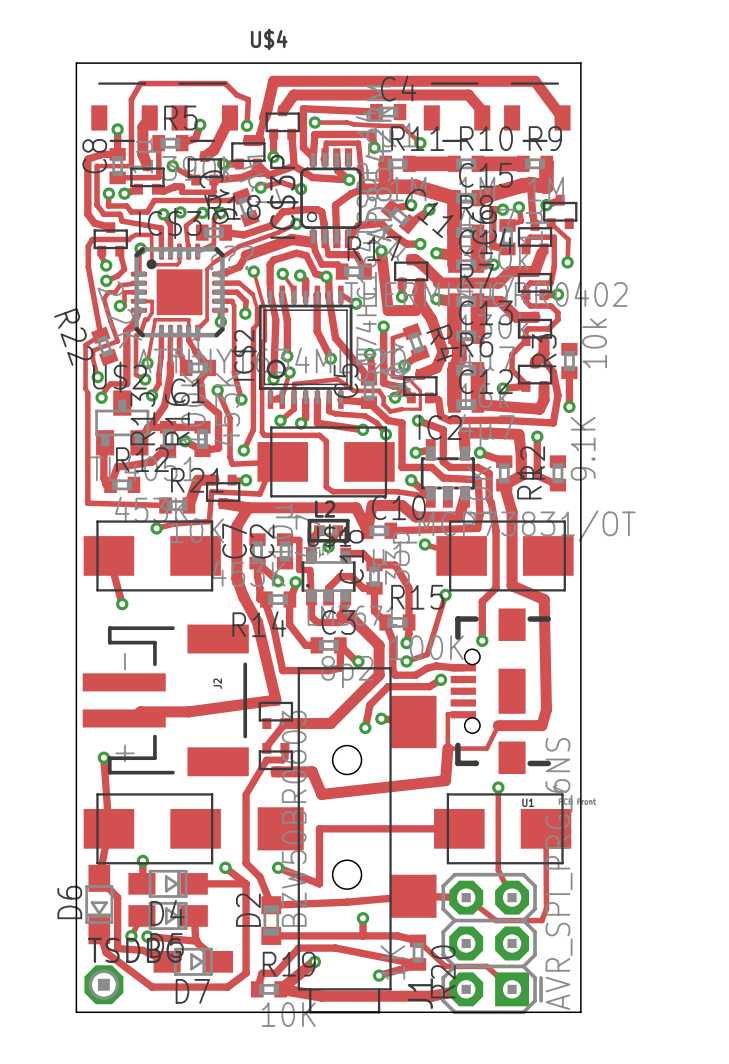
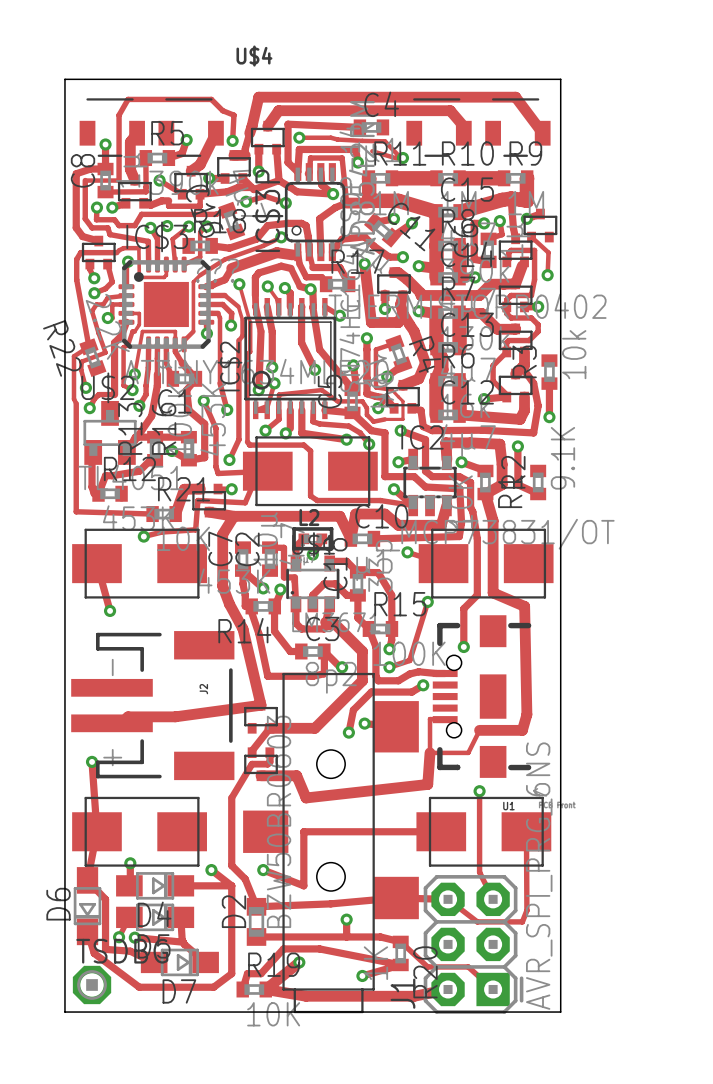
track: (402, 126) (420, 143) -> (384, 141) (402, 160) (372, 151)

